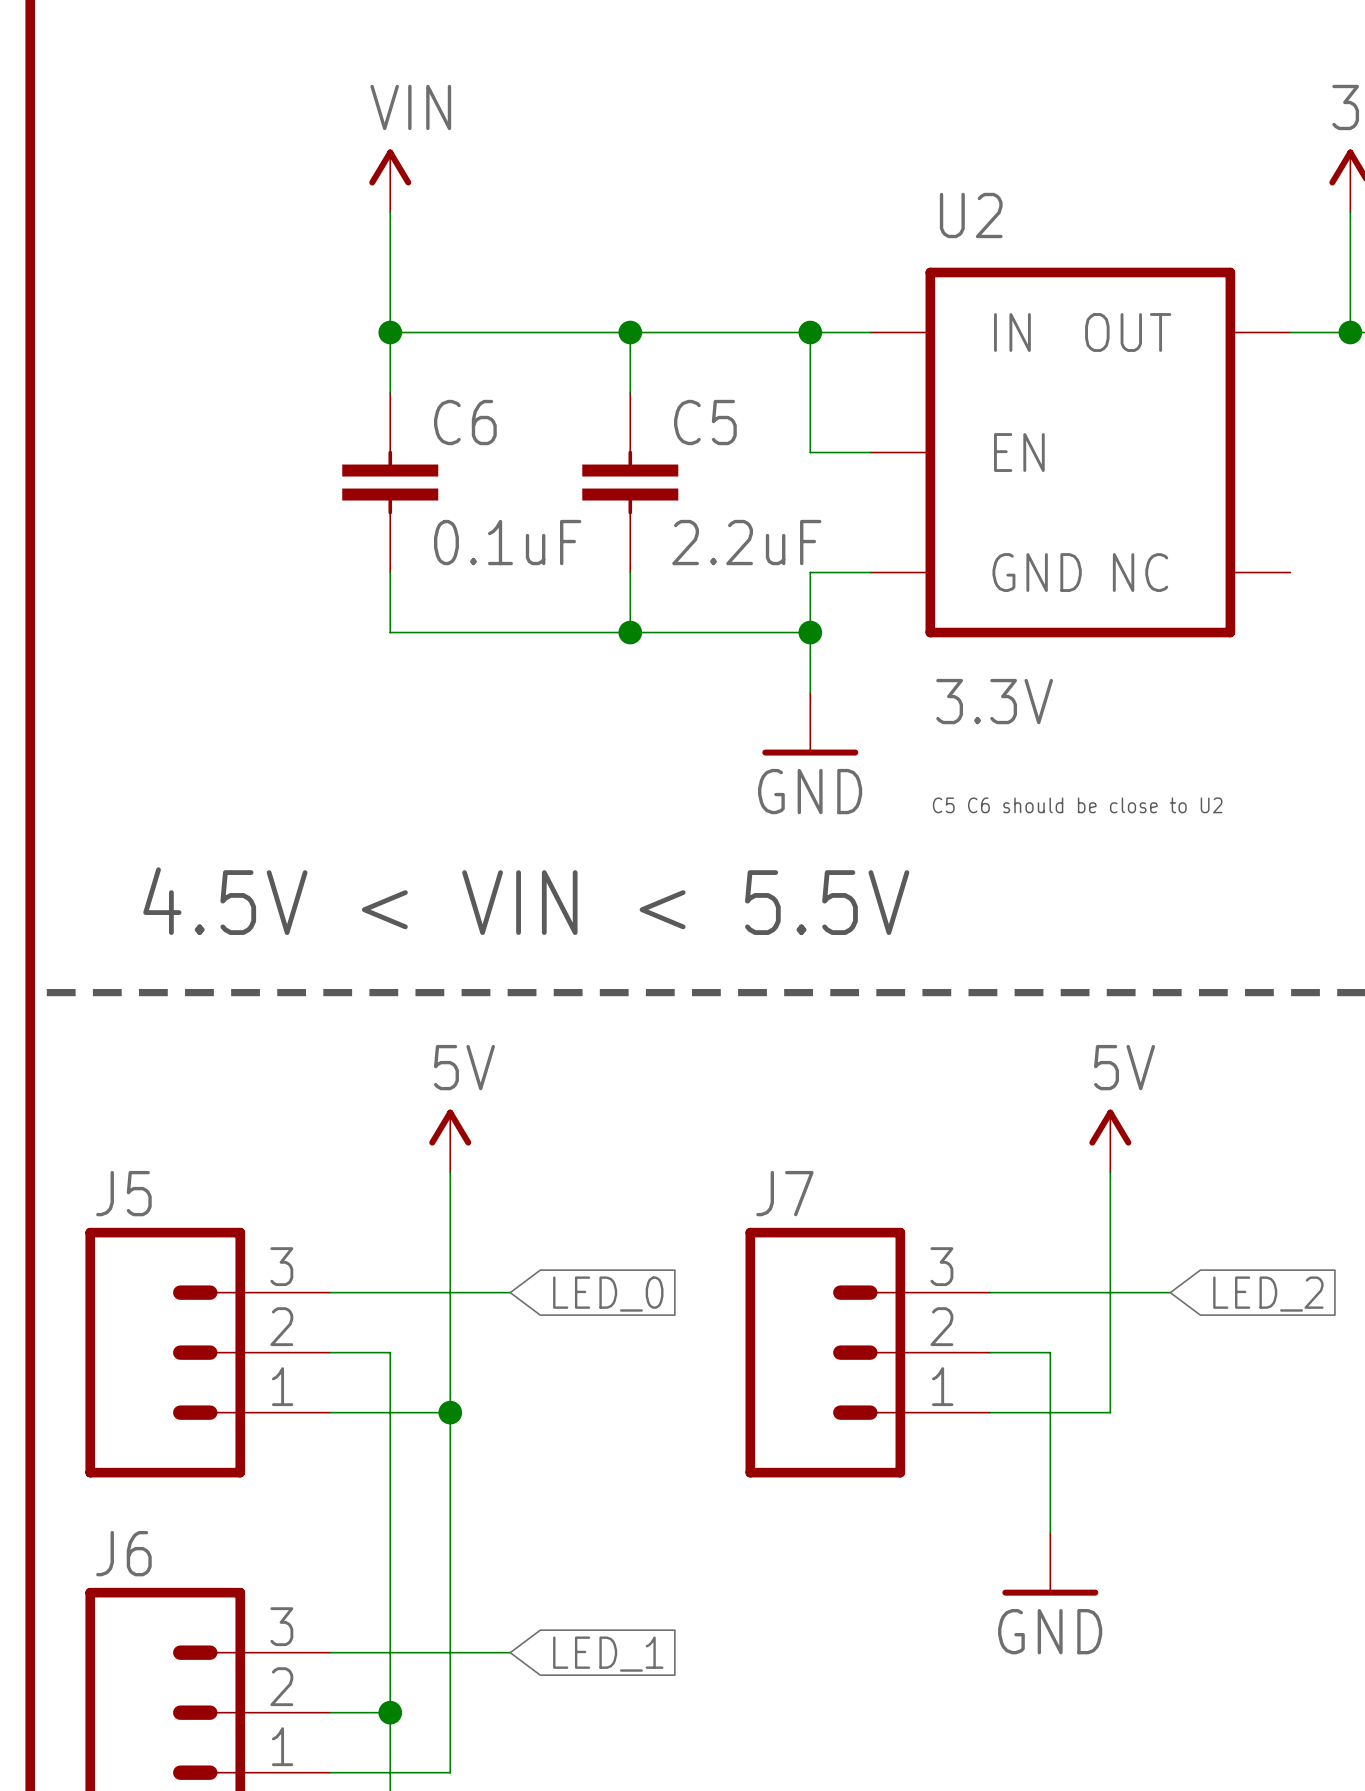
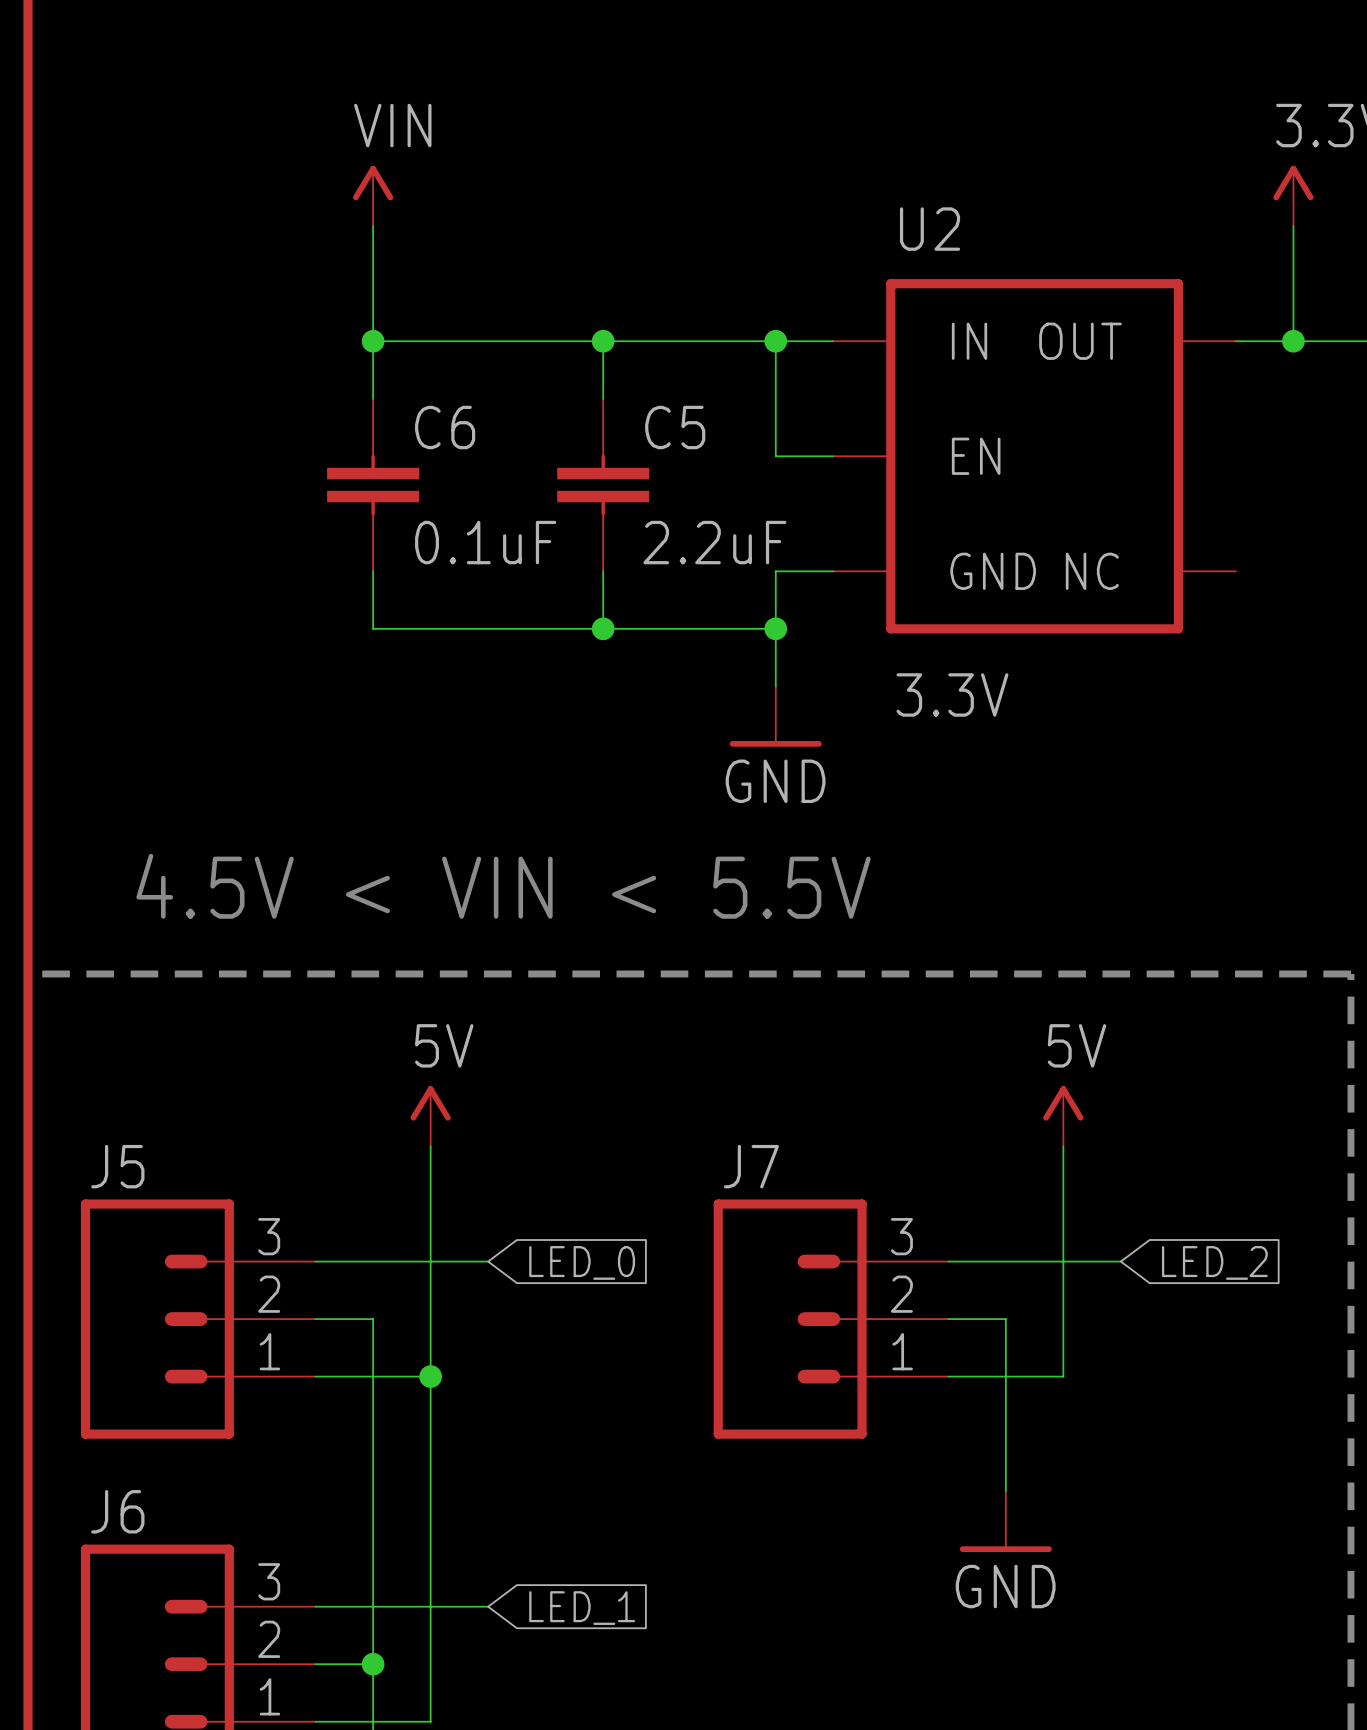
text: C5 C6 should be close to U2 (1077, 805) -> none

